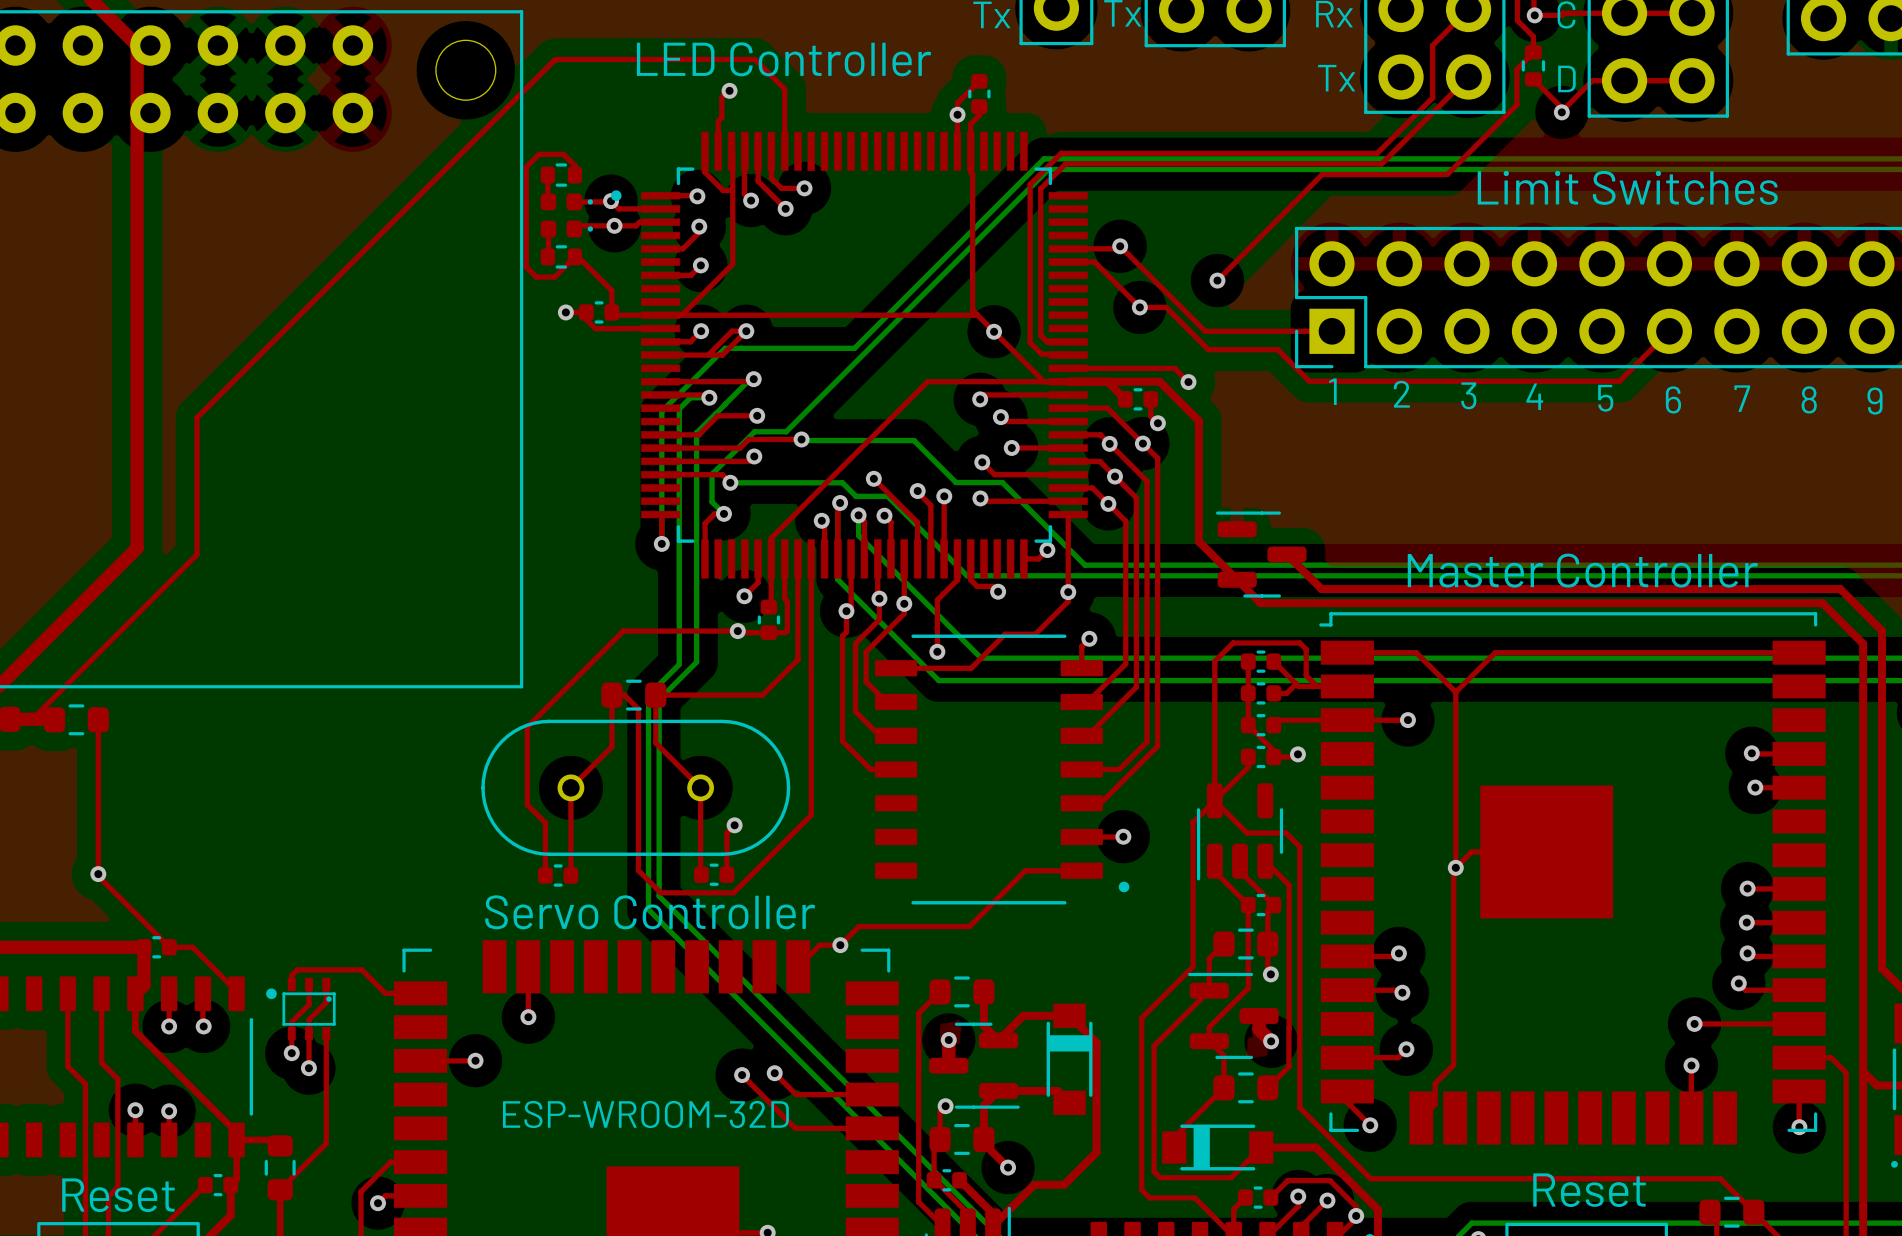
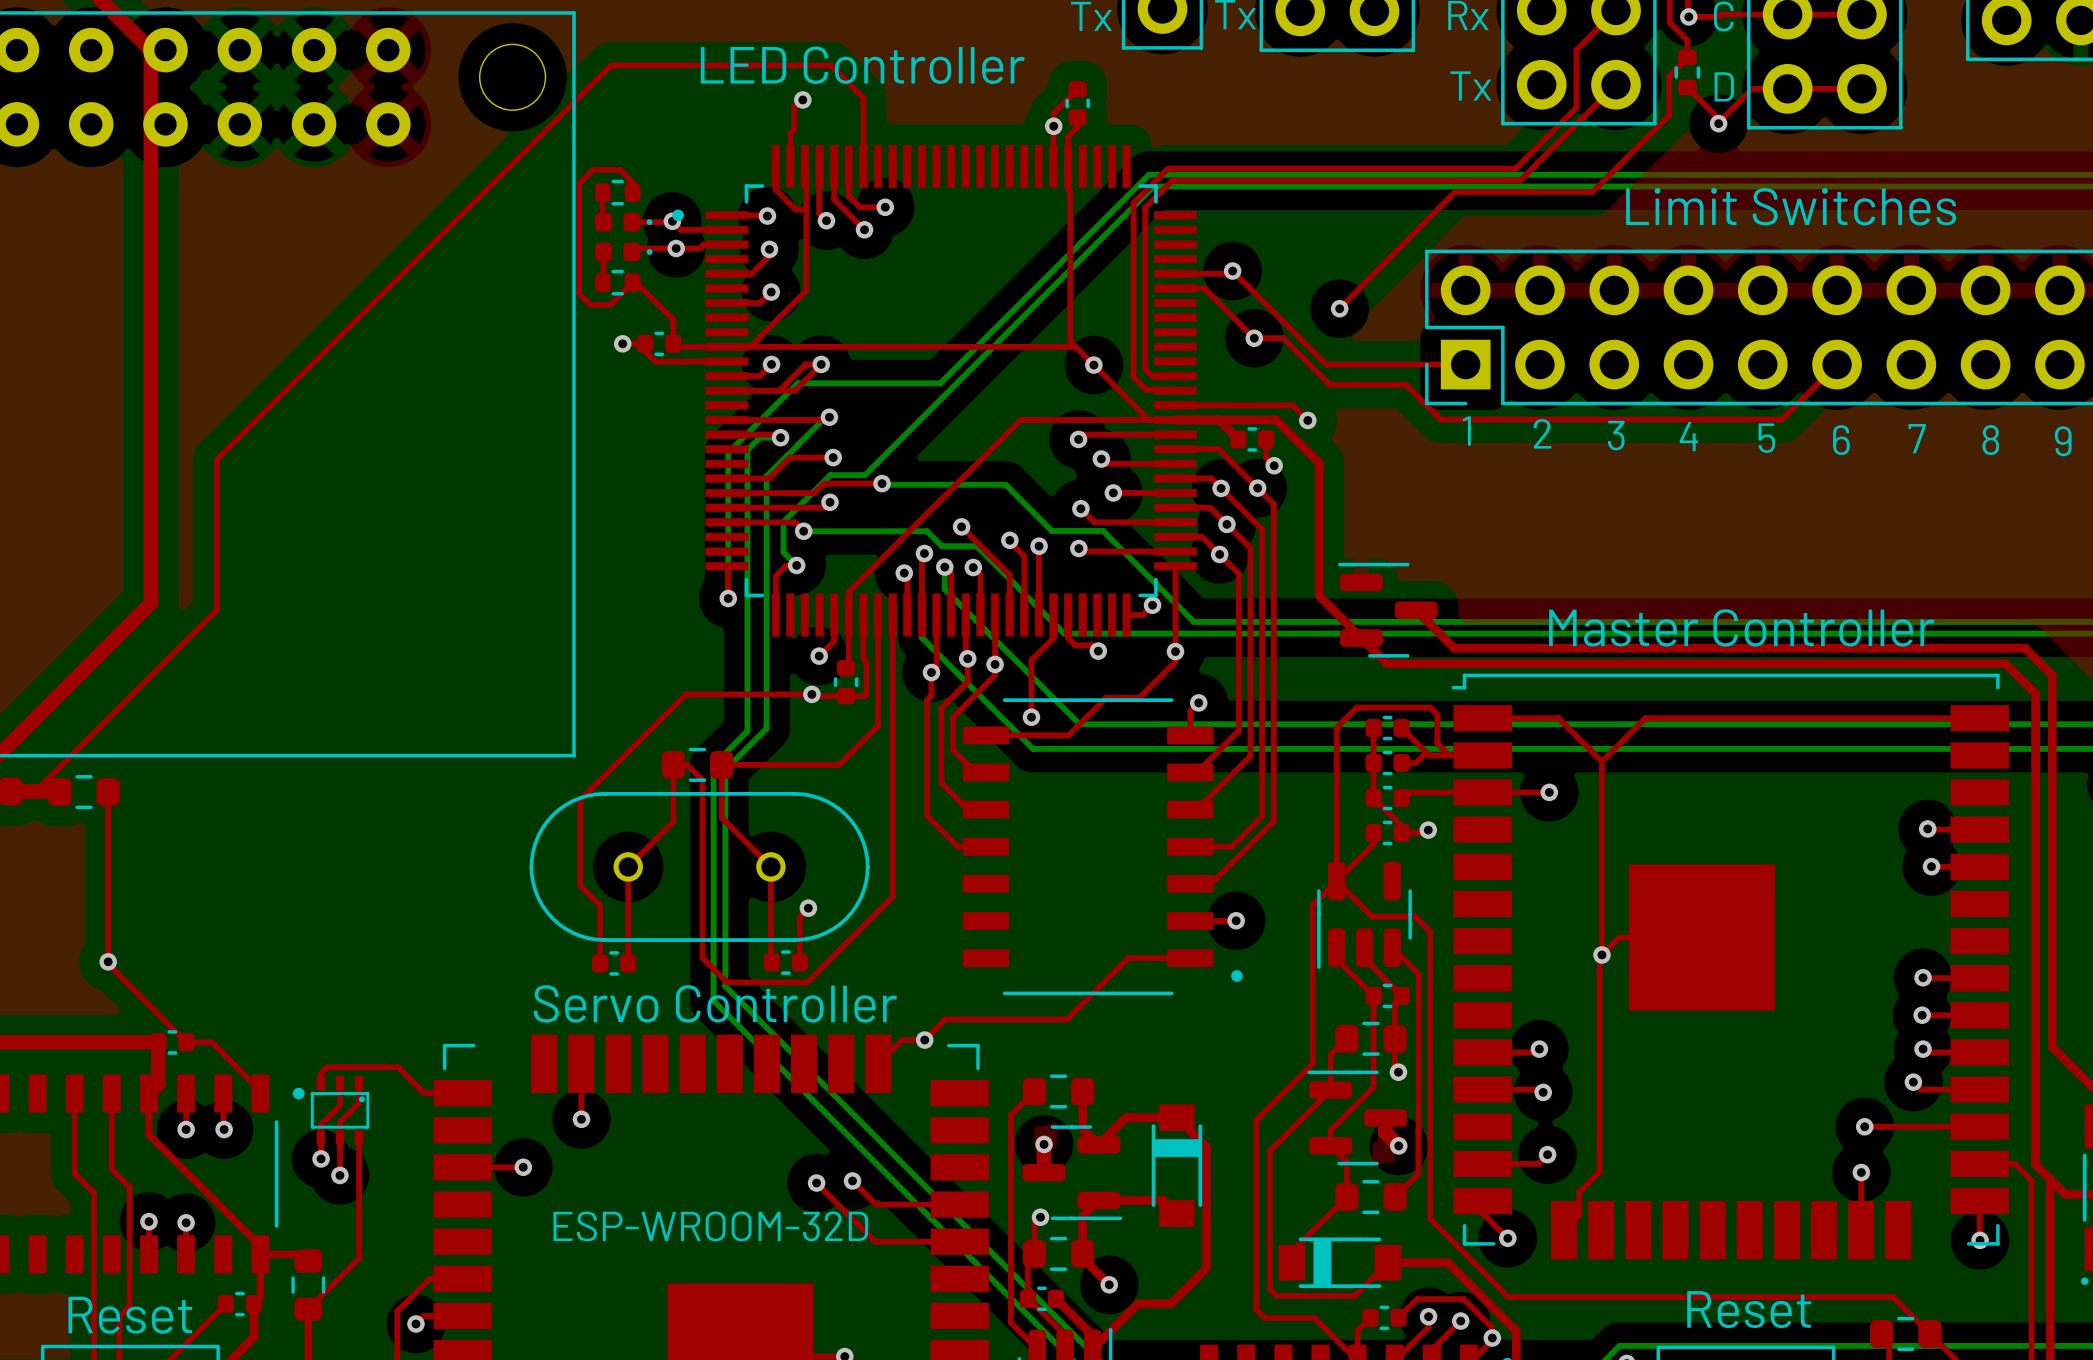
top track: (1865, 613) (1882, 630) (1882, 968) -> (2052, 675) (2052, 1047) (2071, 1065)
top track: (1849, 630) (1863, 643) (1863, 1071) -> (2035, 693) (2035, 1164) (2050, 1179)

